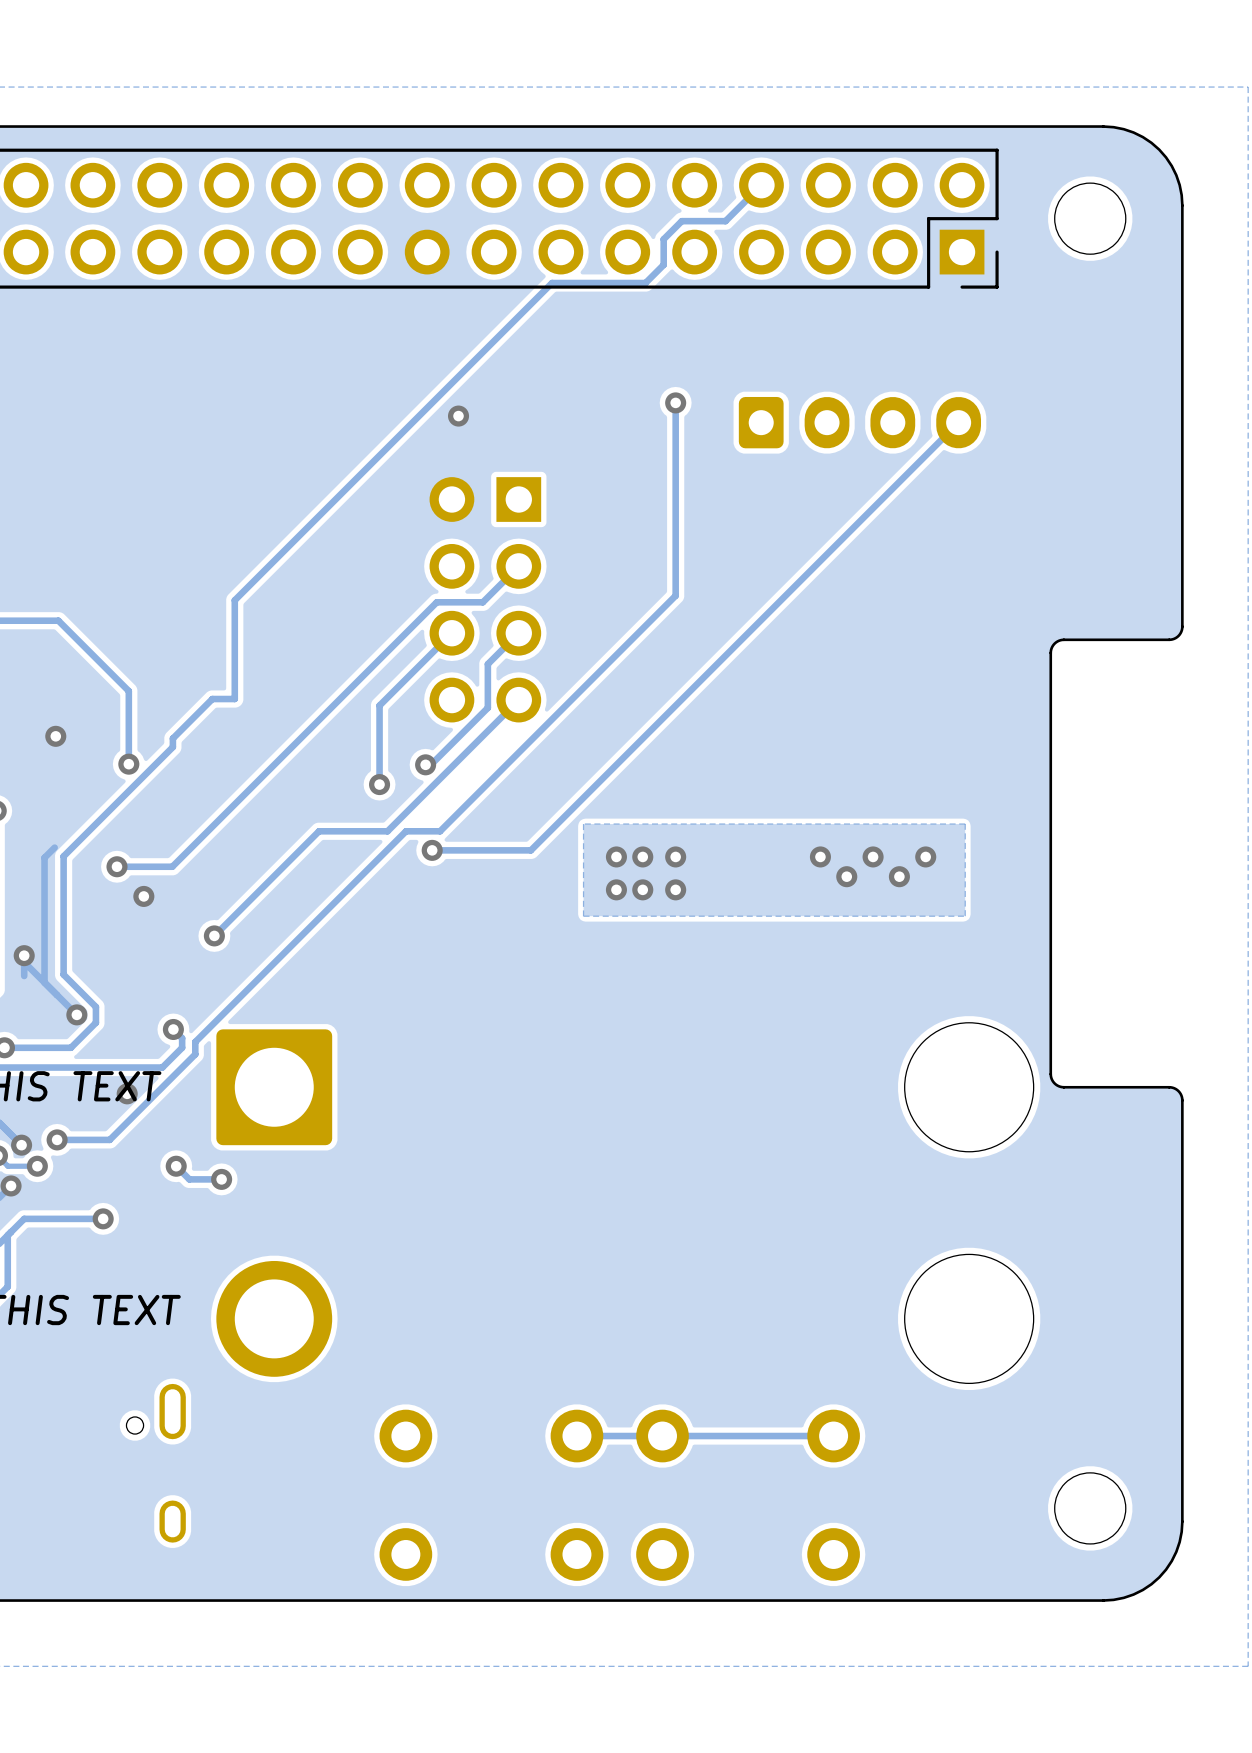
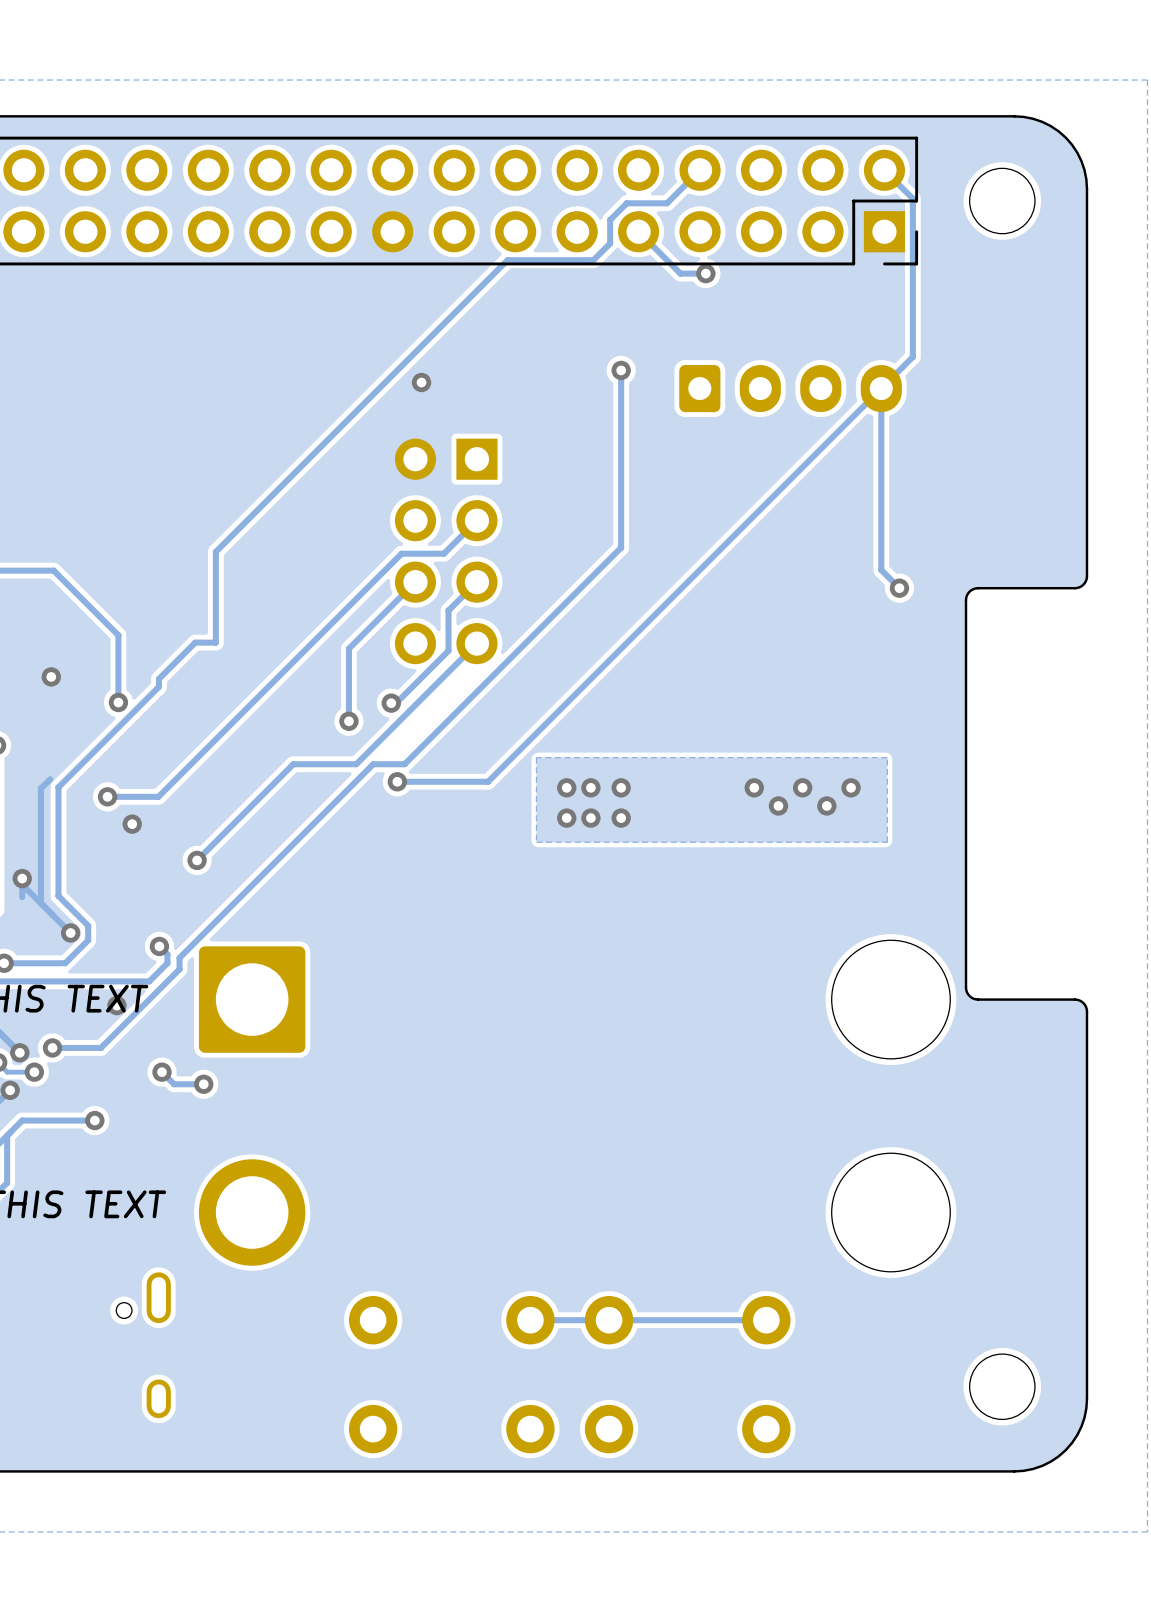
track: none -> (884, 170) (912, 198) (912, 356) (881, 388) (881, 570) (899, 588)
track: none -> (638, 231) (680, 273) (705, 273)
via: none -> (705, 273)
via: none -> (899, 588)

